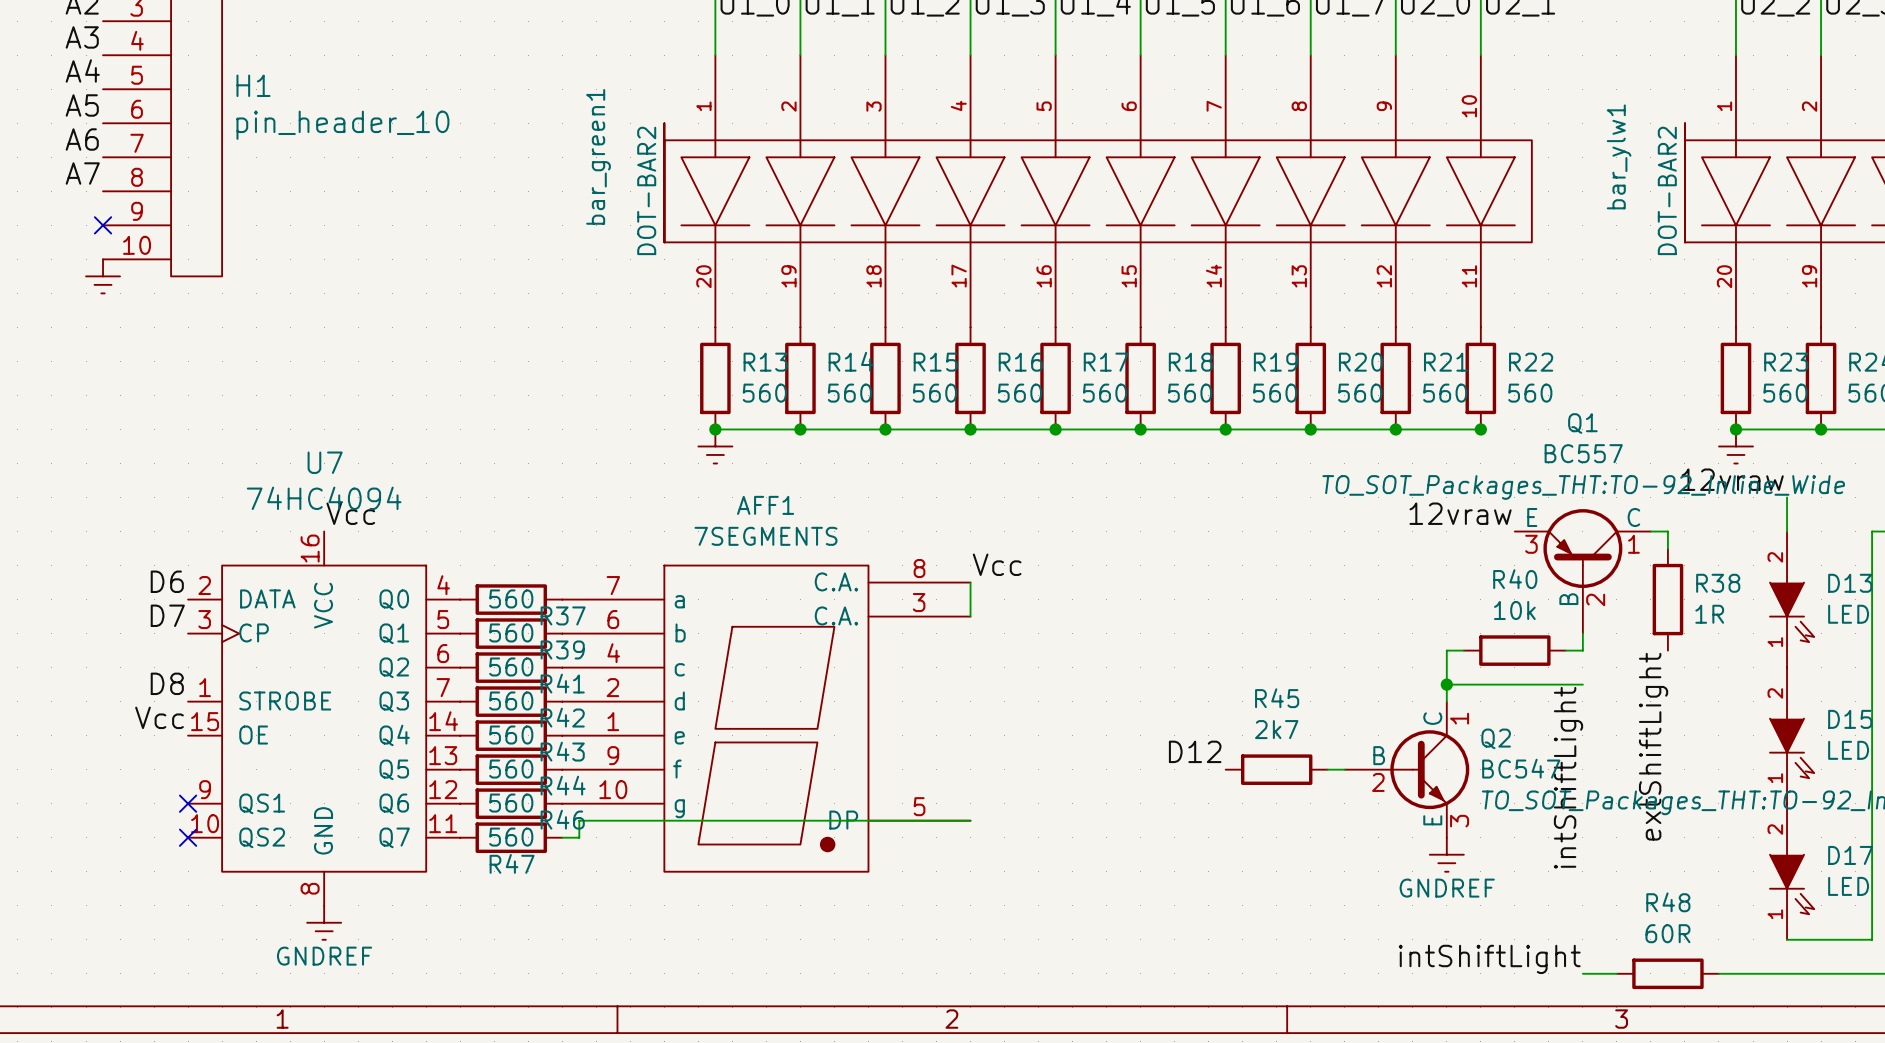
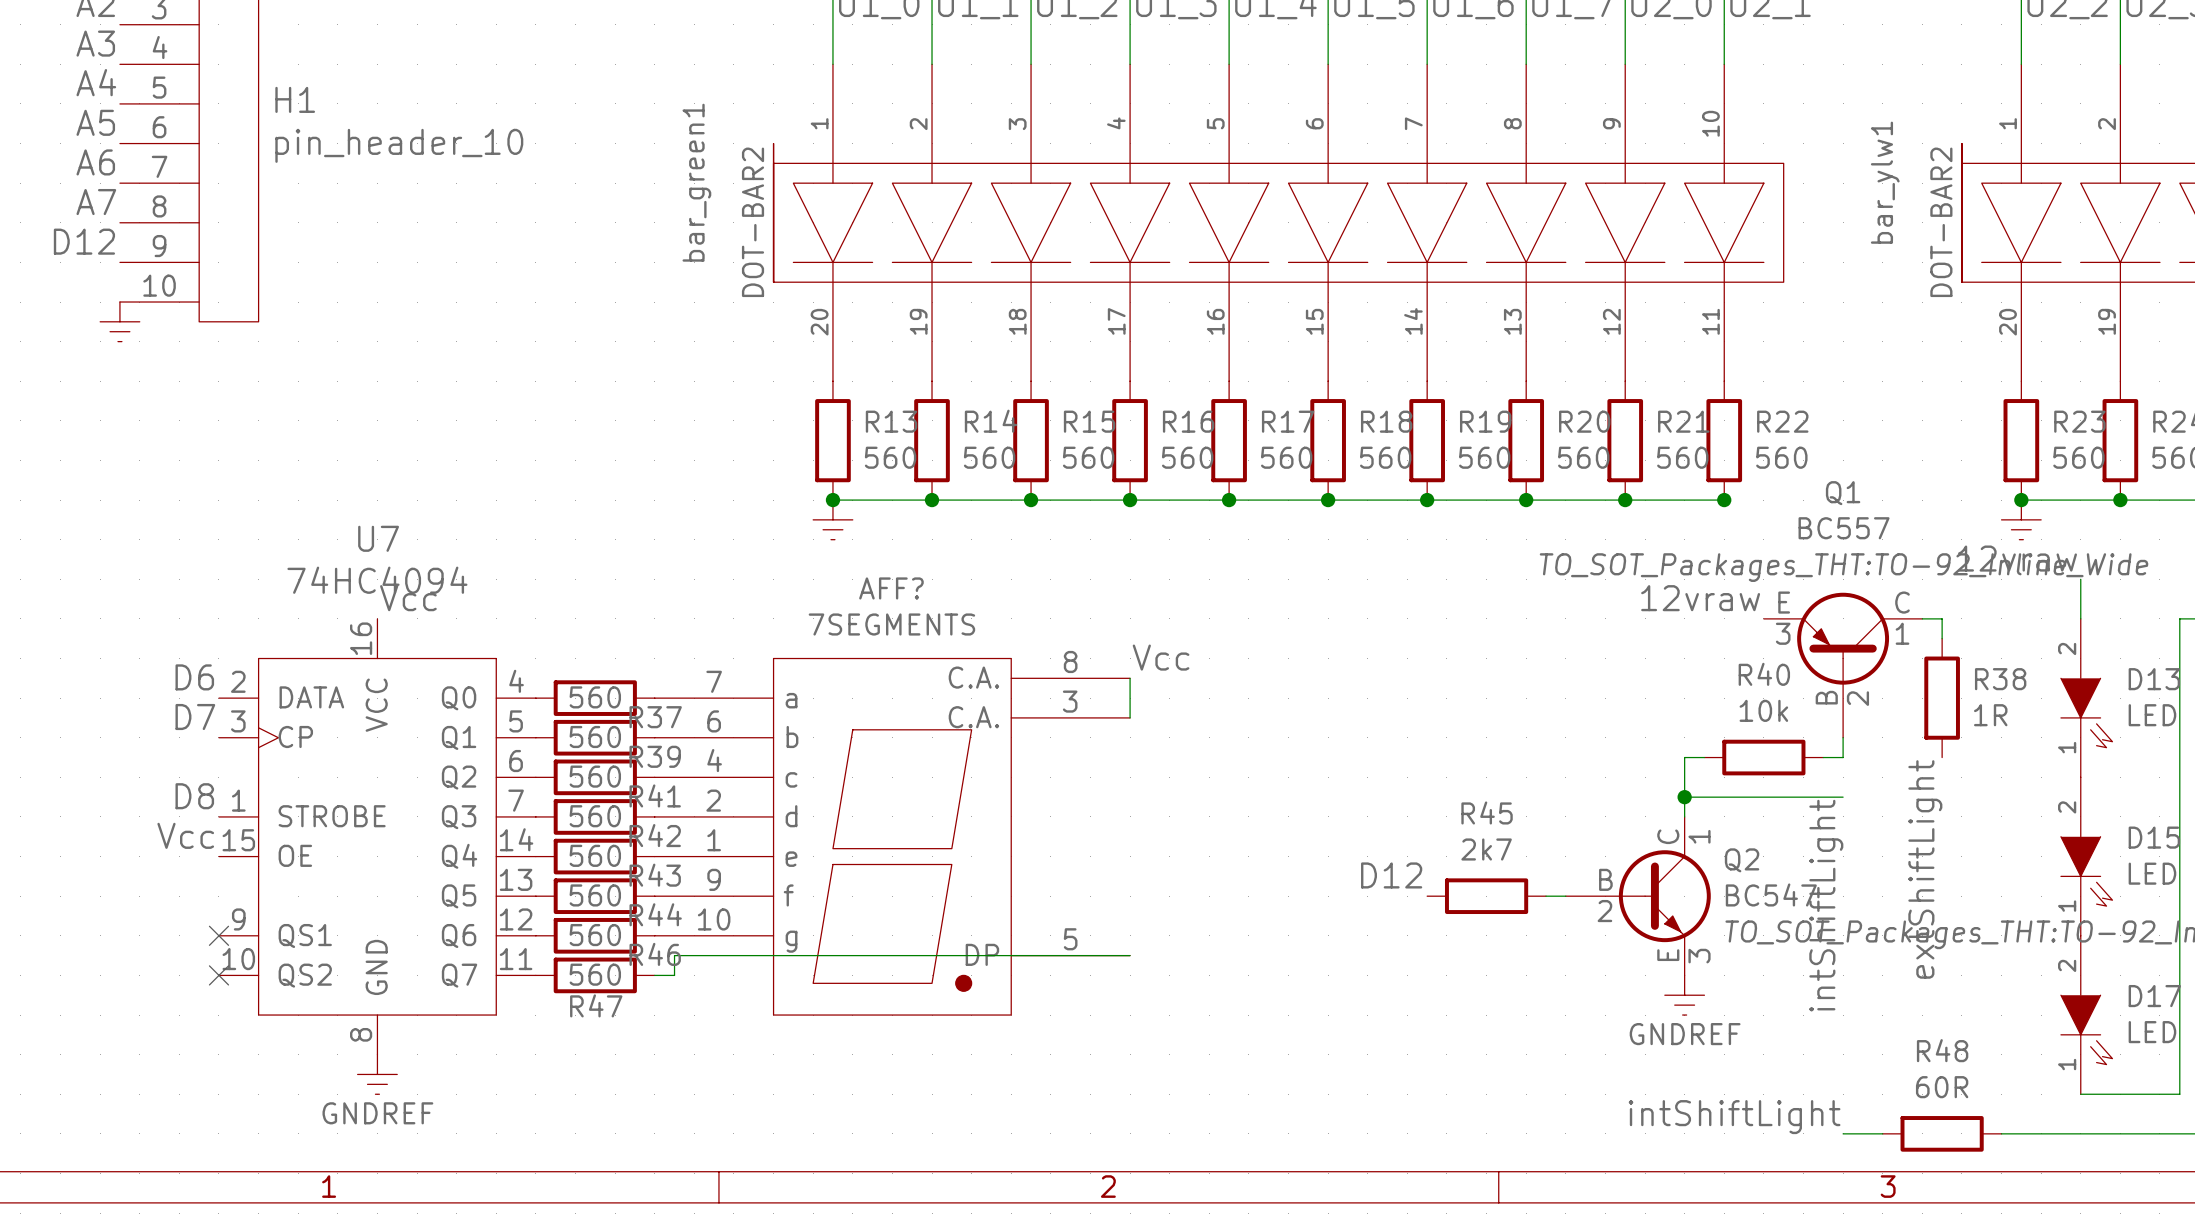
label: none -> D12 (84, 241)
no-connect mark: (103, 225) -> none
AFF1 name: AFF1 (765, 505) -> AFF? (891, 588)

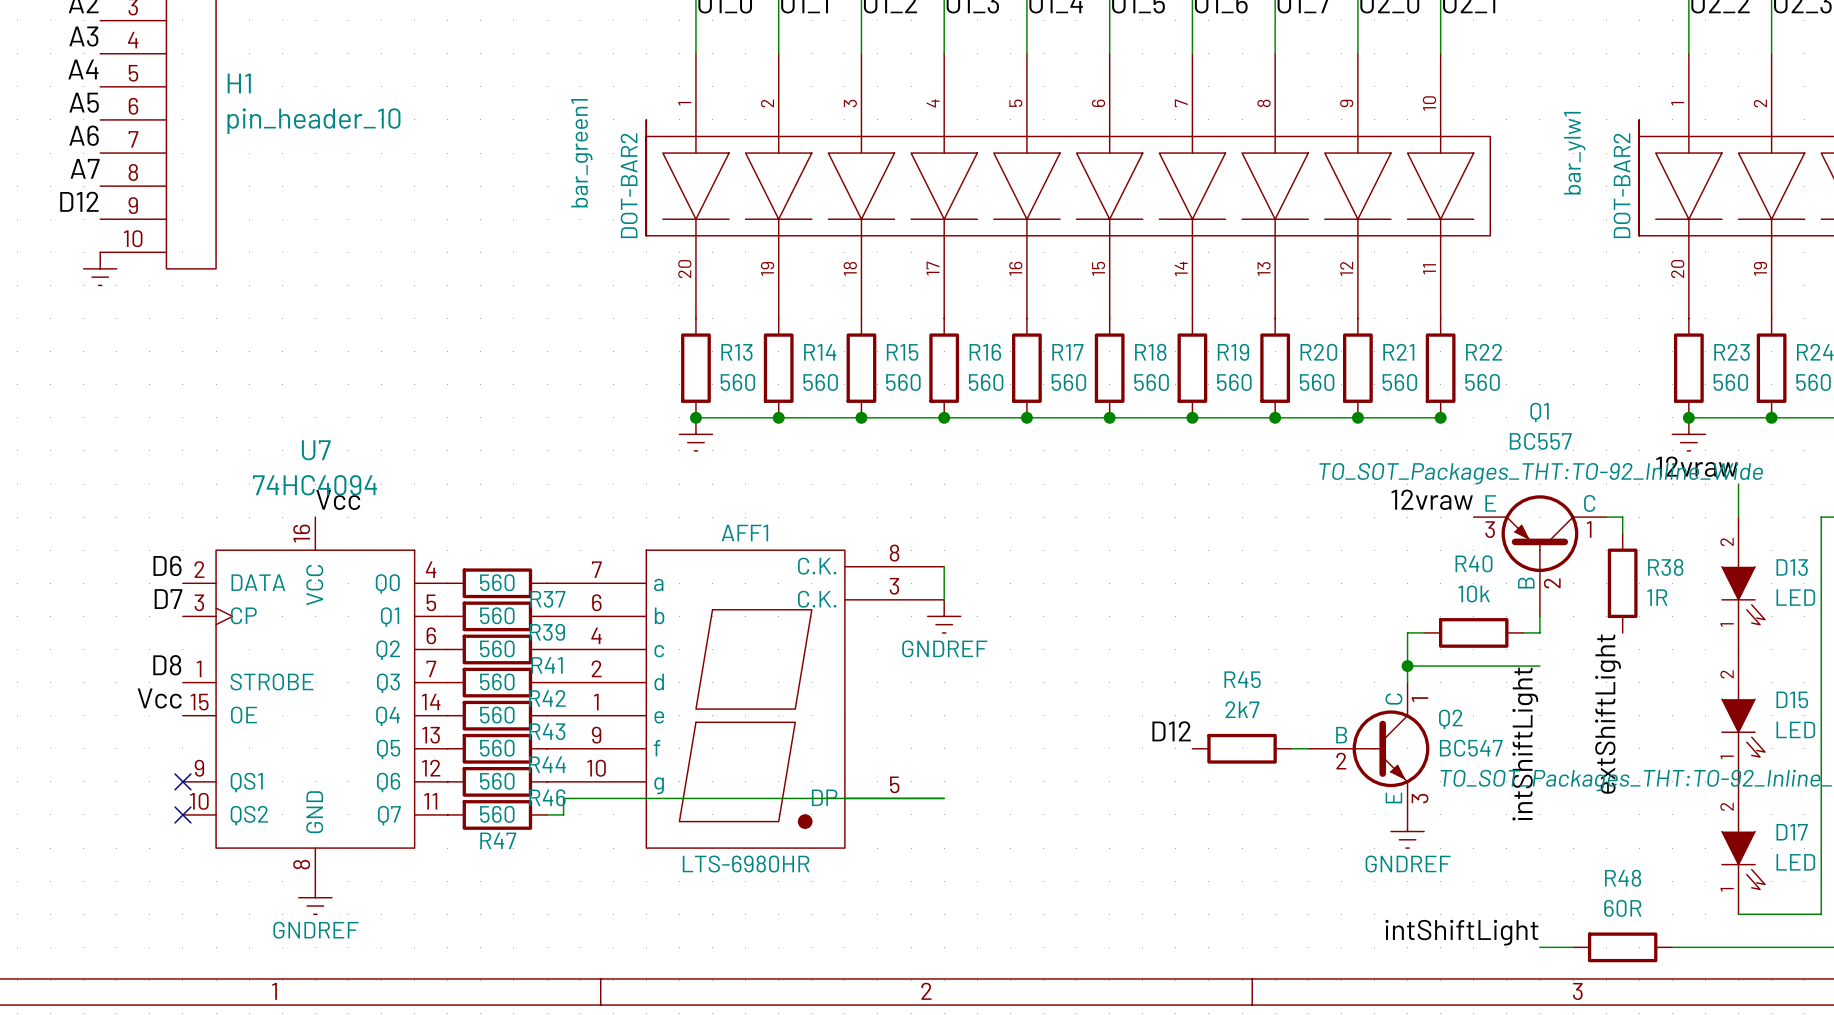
AFF? name: AFF? (891, 588) -> AFF1 (744, 533)
AFF? value: 7SEGMENTS (891, 624) -> LTS-6980HR (746, 864)
label: Vcc (1161, 657) -> none
AFF? pin name: C.A. (973, 677) -> C.K. (817, 566)
AFF? pin name: C.A. (973, 717) -> C.K. (817, 599)
power symbol: none -> GNDREF (944, 616)

